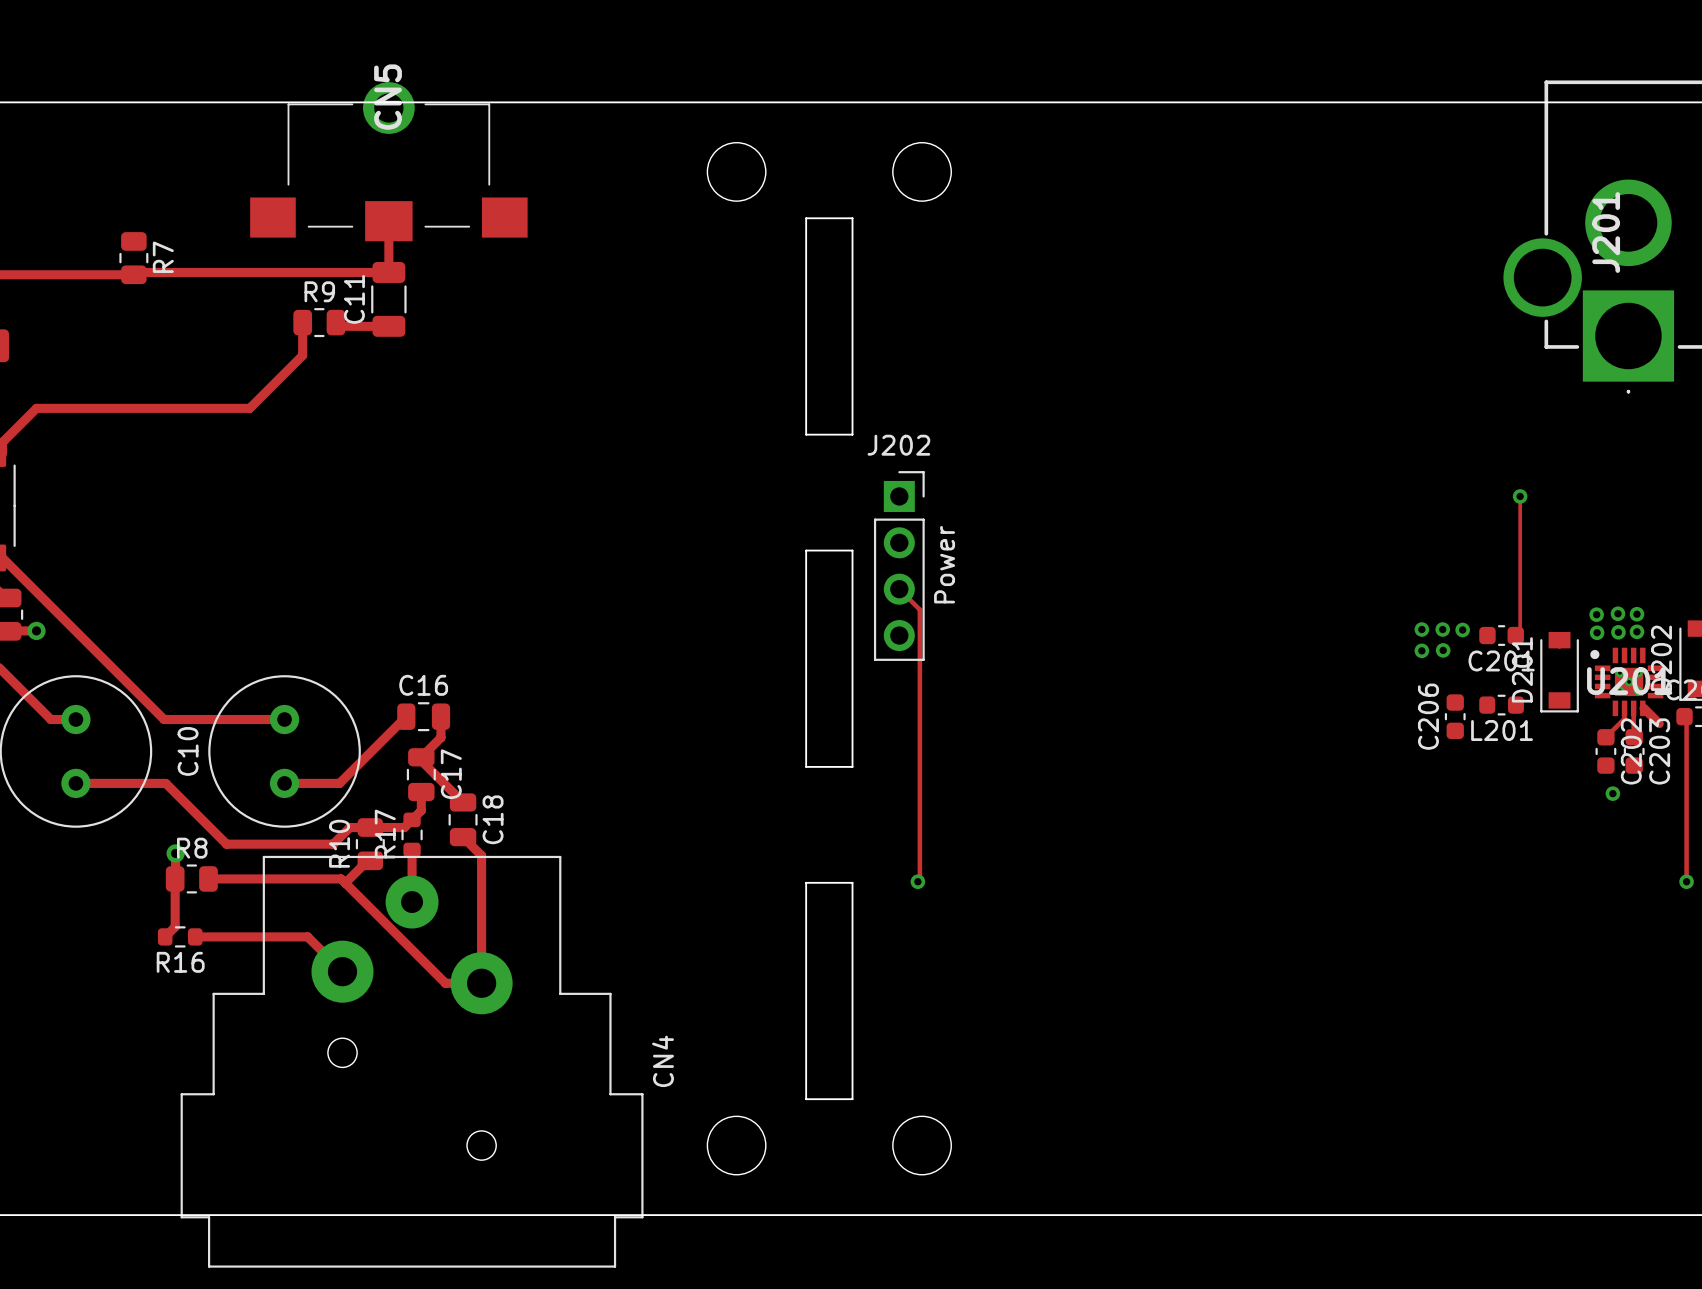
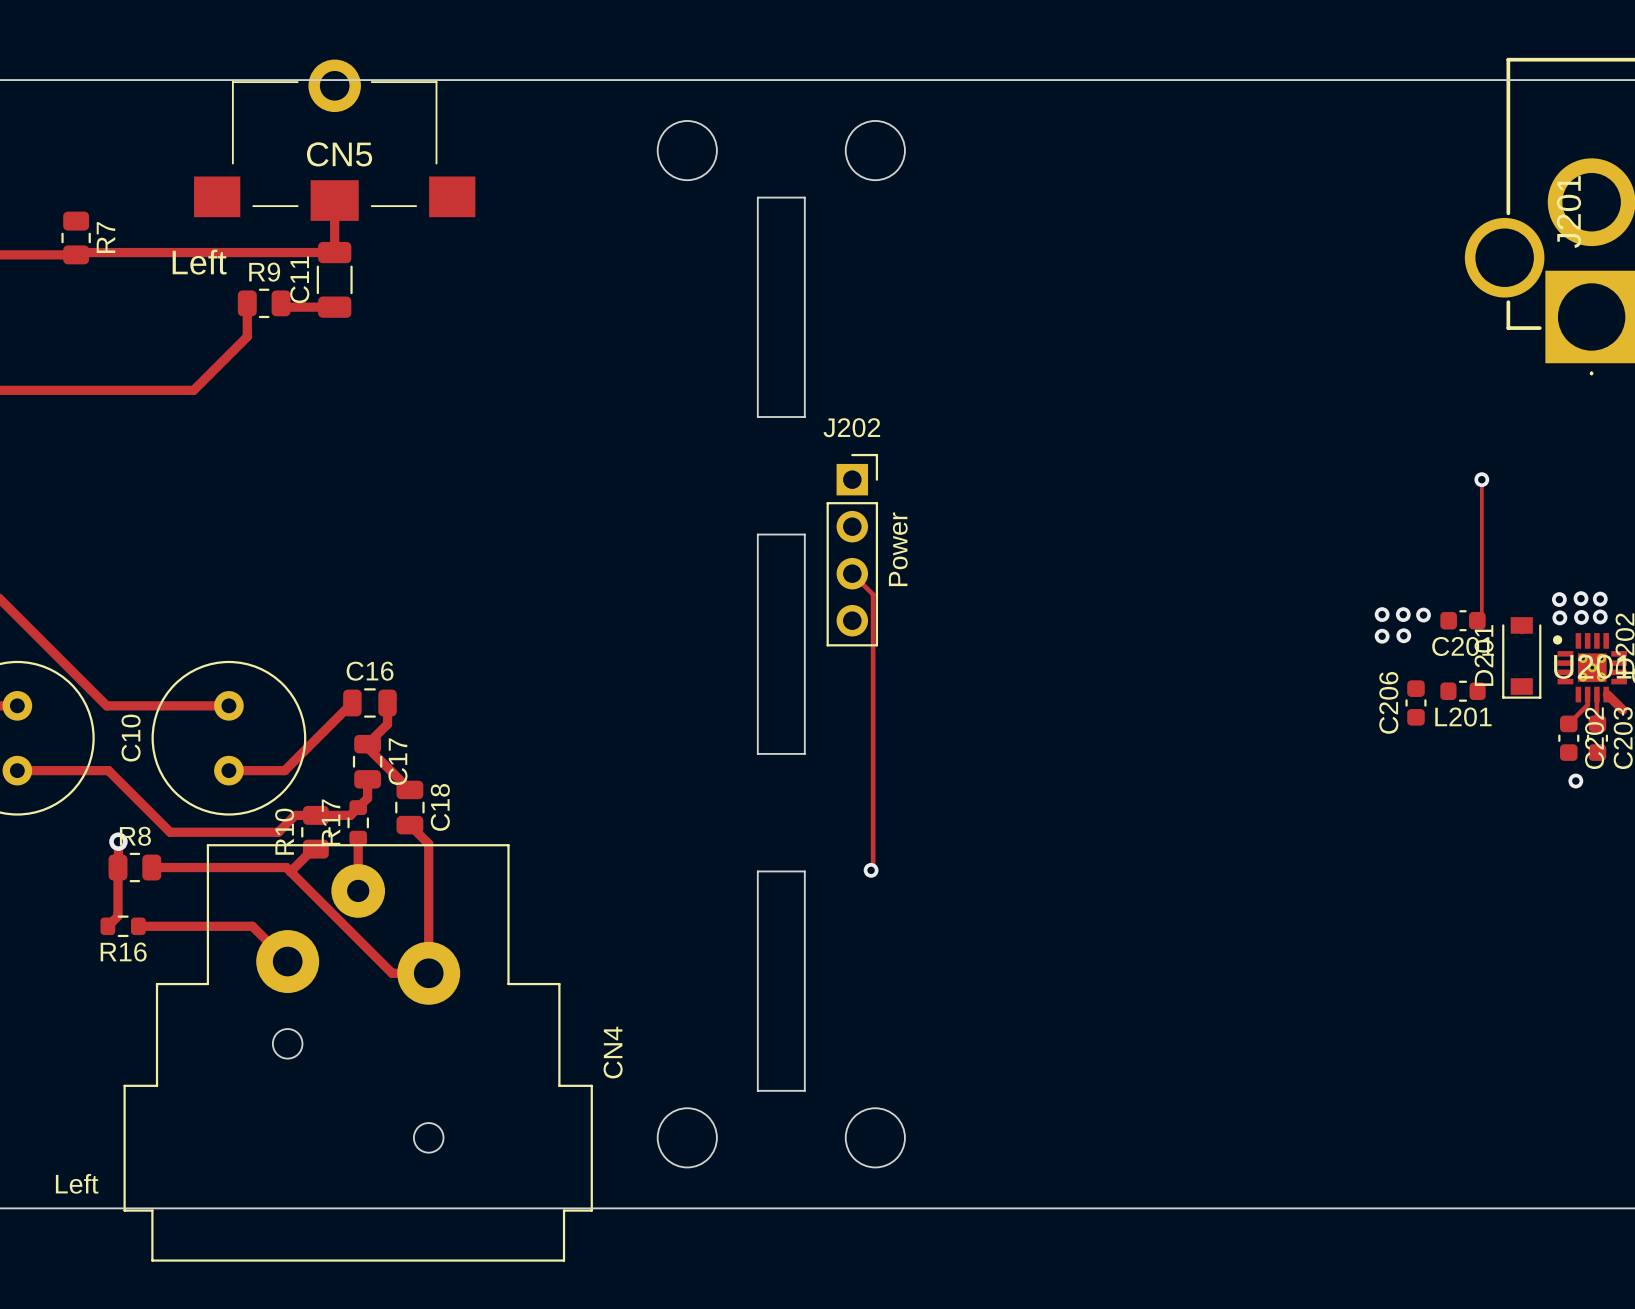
CN5 name rotation: 0° (388, 97) -> 90° clockwise (339, 154)
CN5 value: none -> Left (199, 262)
CN4 value: none -> Left (77, 1183)

